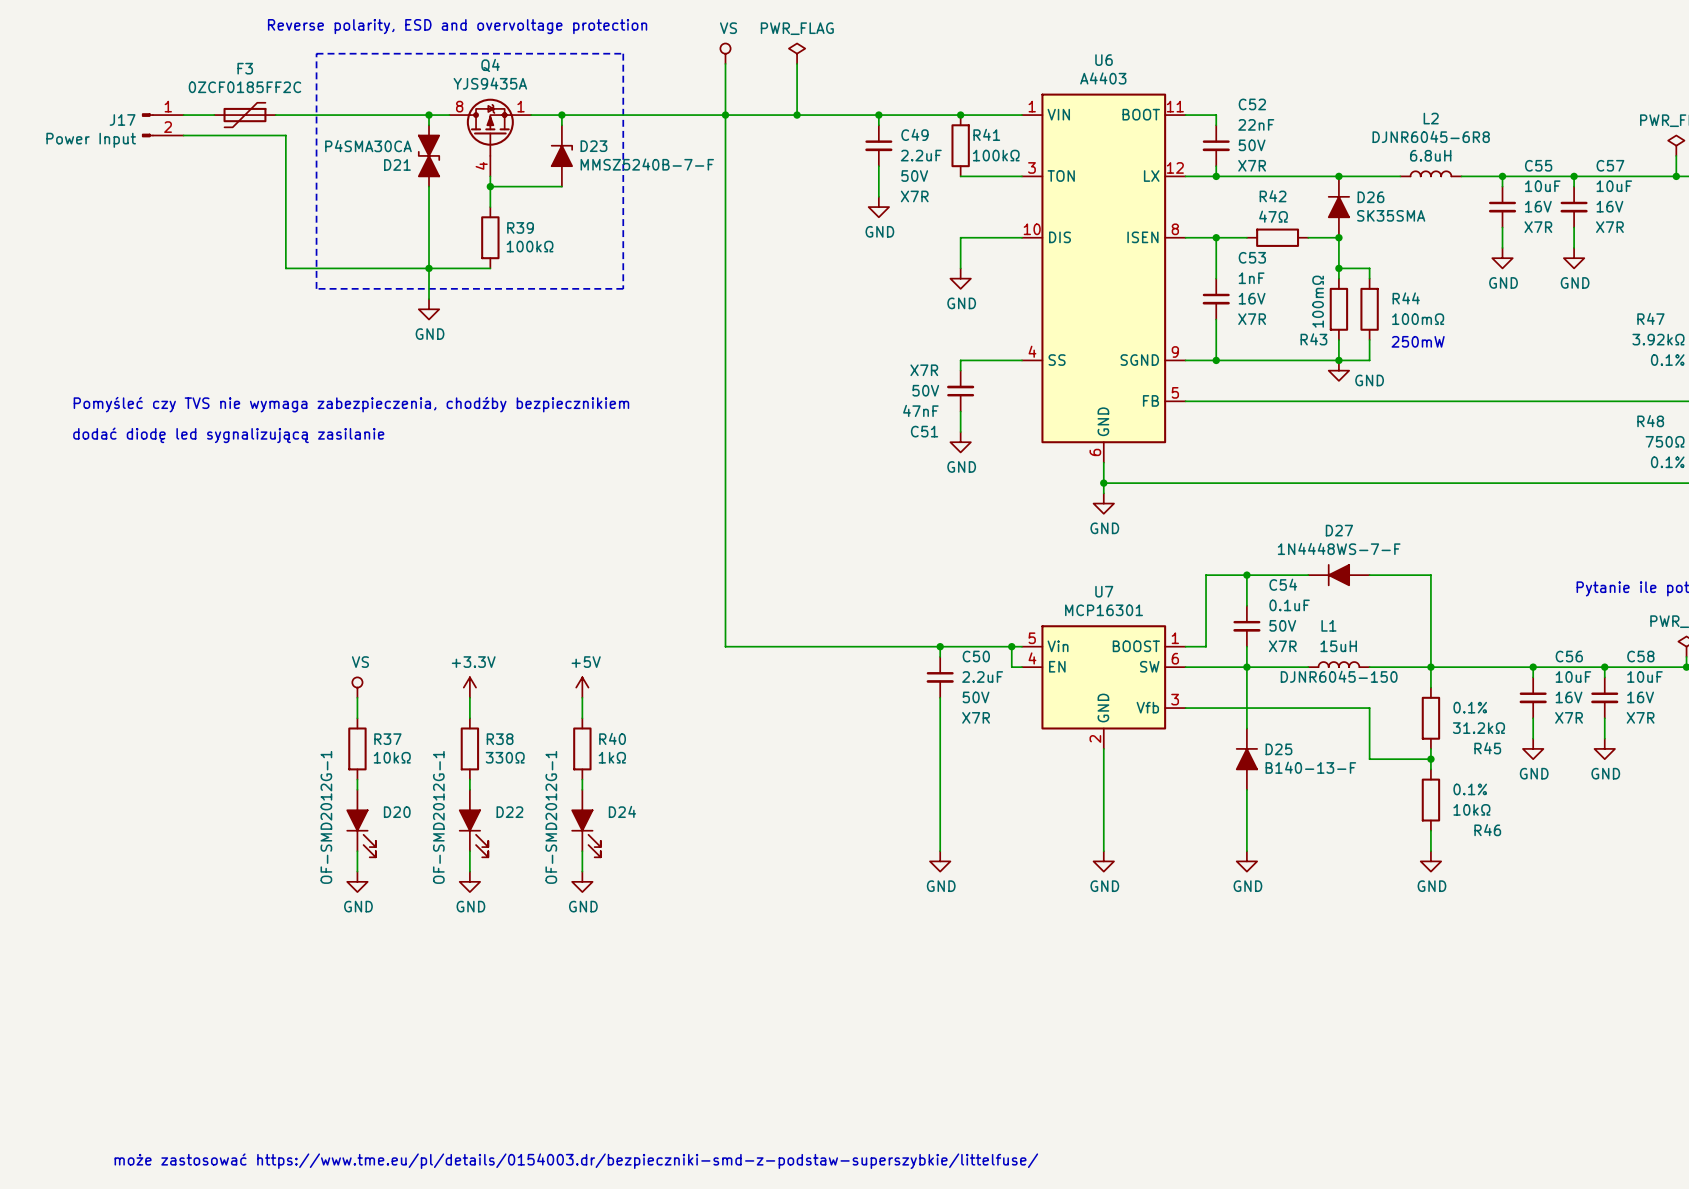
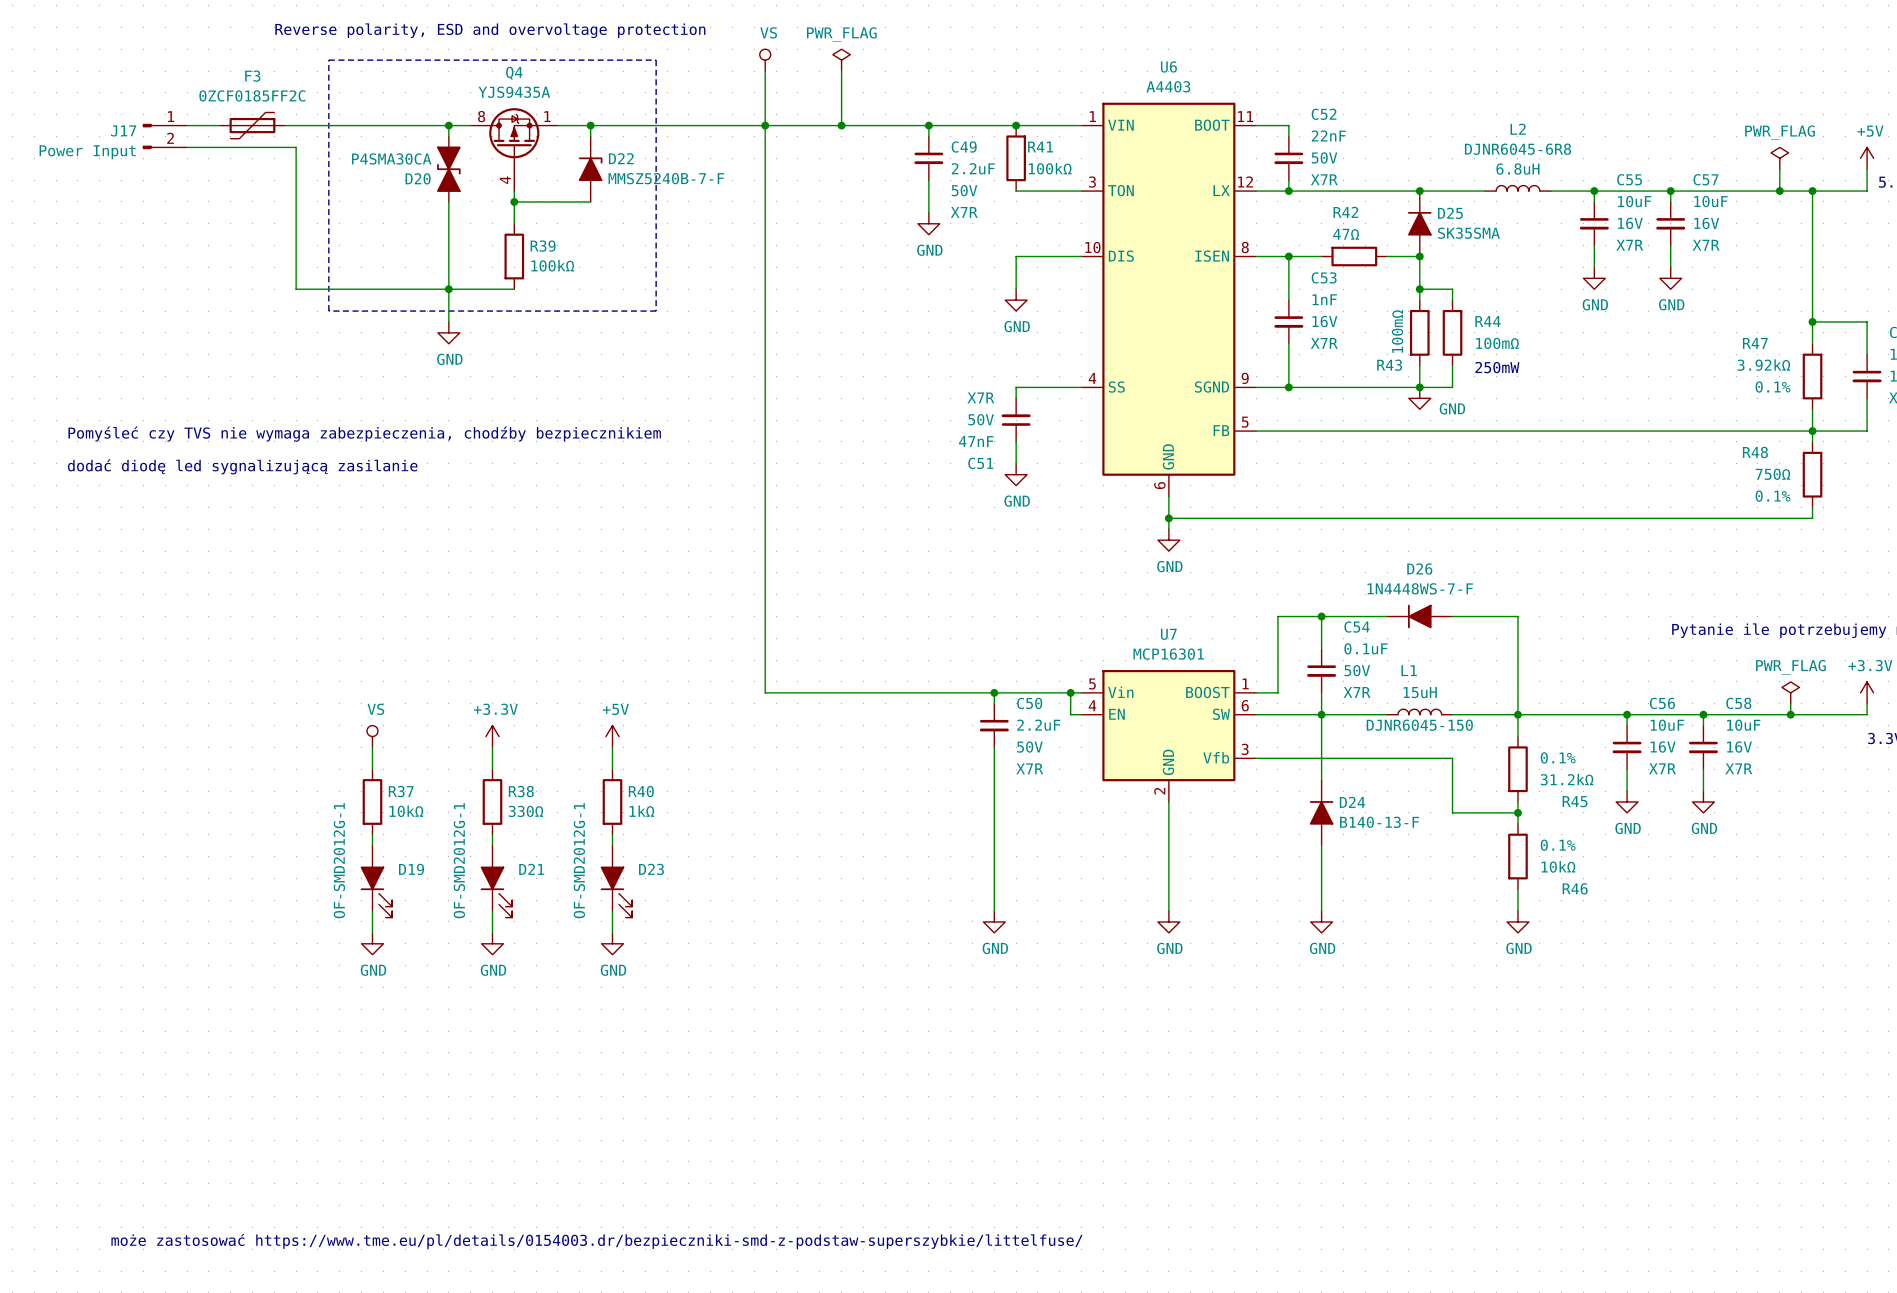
D23 name: D23 (593, 146) -> D22 (621, 158)
D21 name: D21 (397, 164) -> D20 (418, 178)
D26 name: D26 (1370, 197) -> D25 (1450, 213)
D27 name: D27 (1339, 530) -> D26 (1419, 568)
D25 name: D25 (1278, 749) -> D24 (1352, 802)
D24 name: D24 (622, 811) -> D23 (651, 869)
D20 name: D20 (397, 812) -> D19 (411, 869)
D22 name: D22 (509, 812) -> D21 (531, 869)

